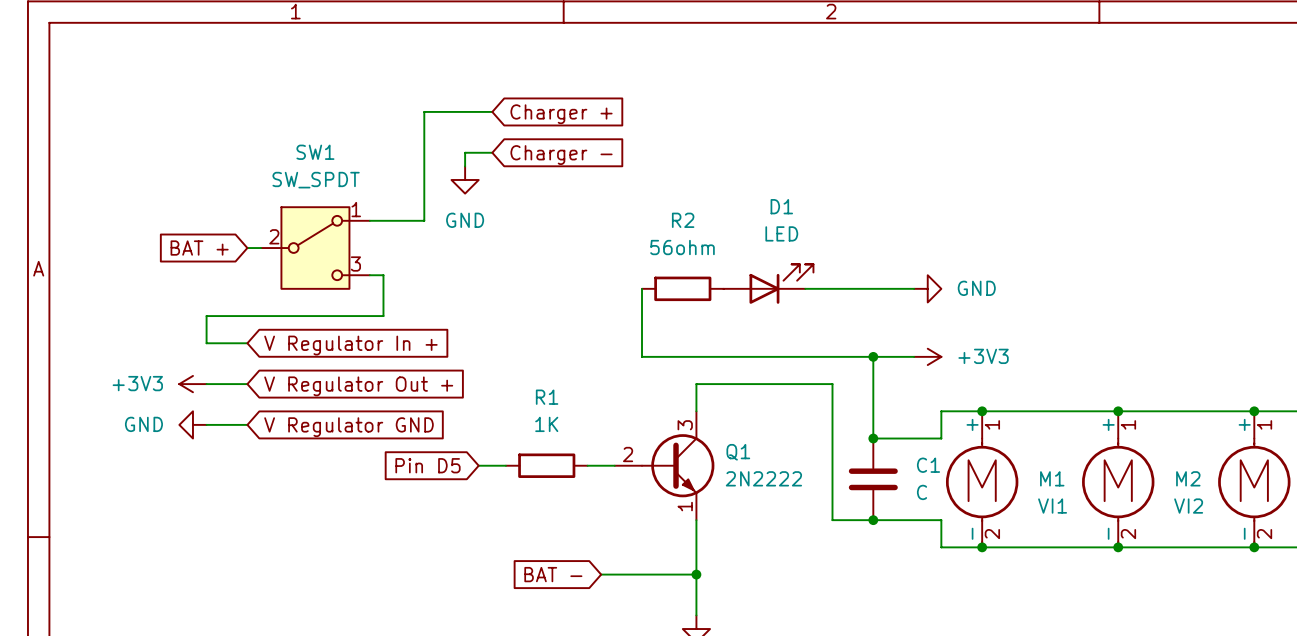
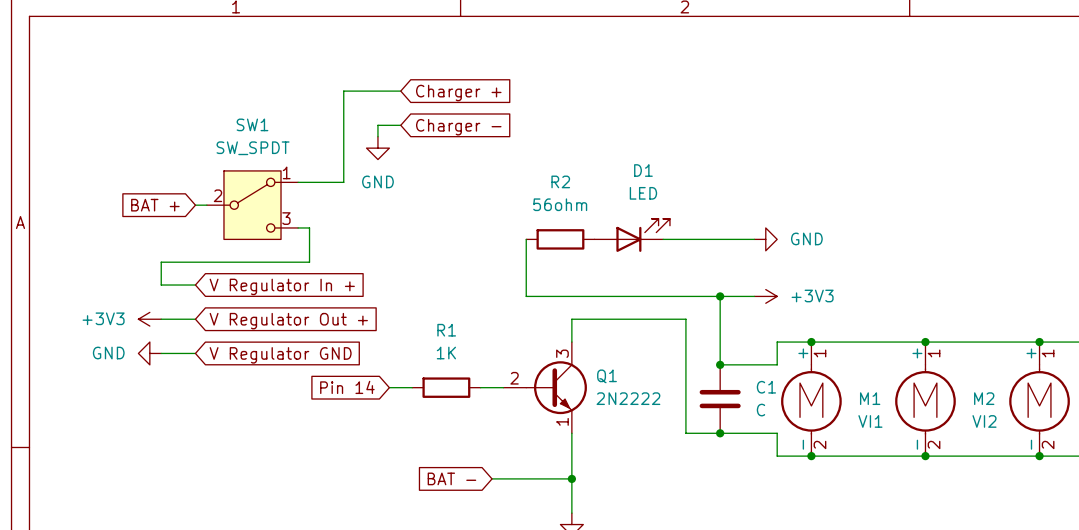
global label: Pin D5 (427, 465) -> Pin 14 (347, 387)

